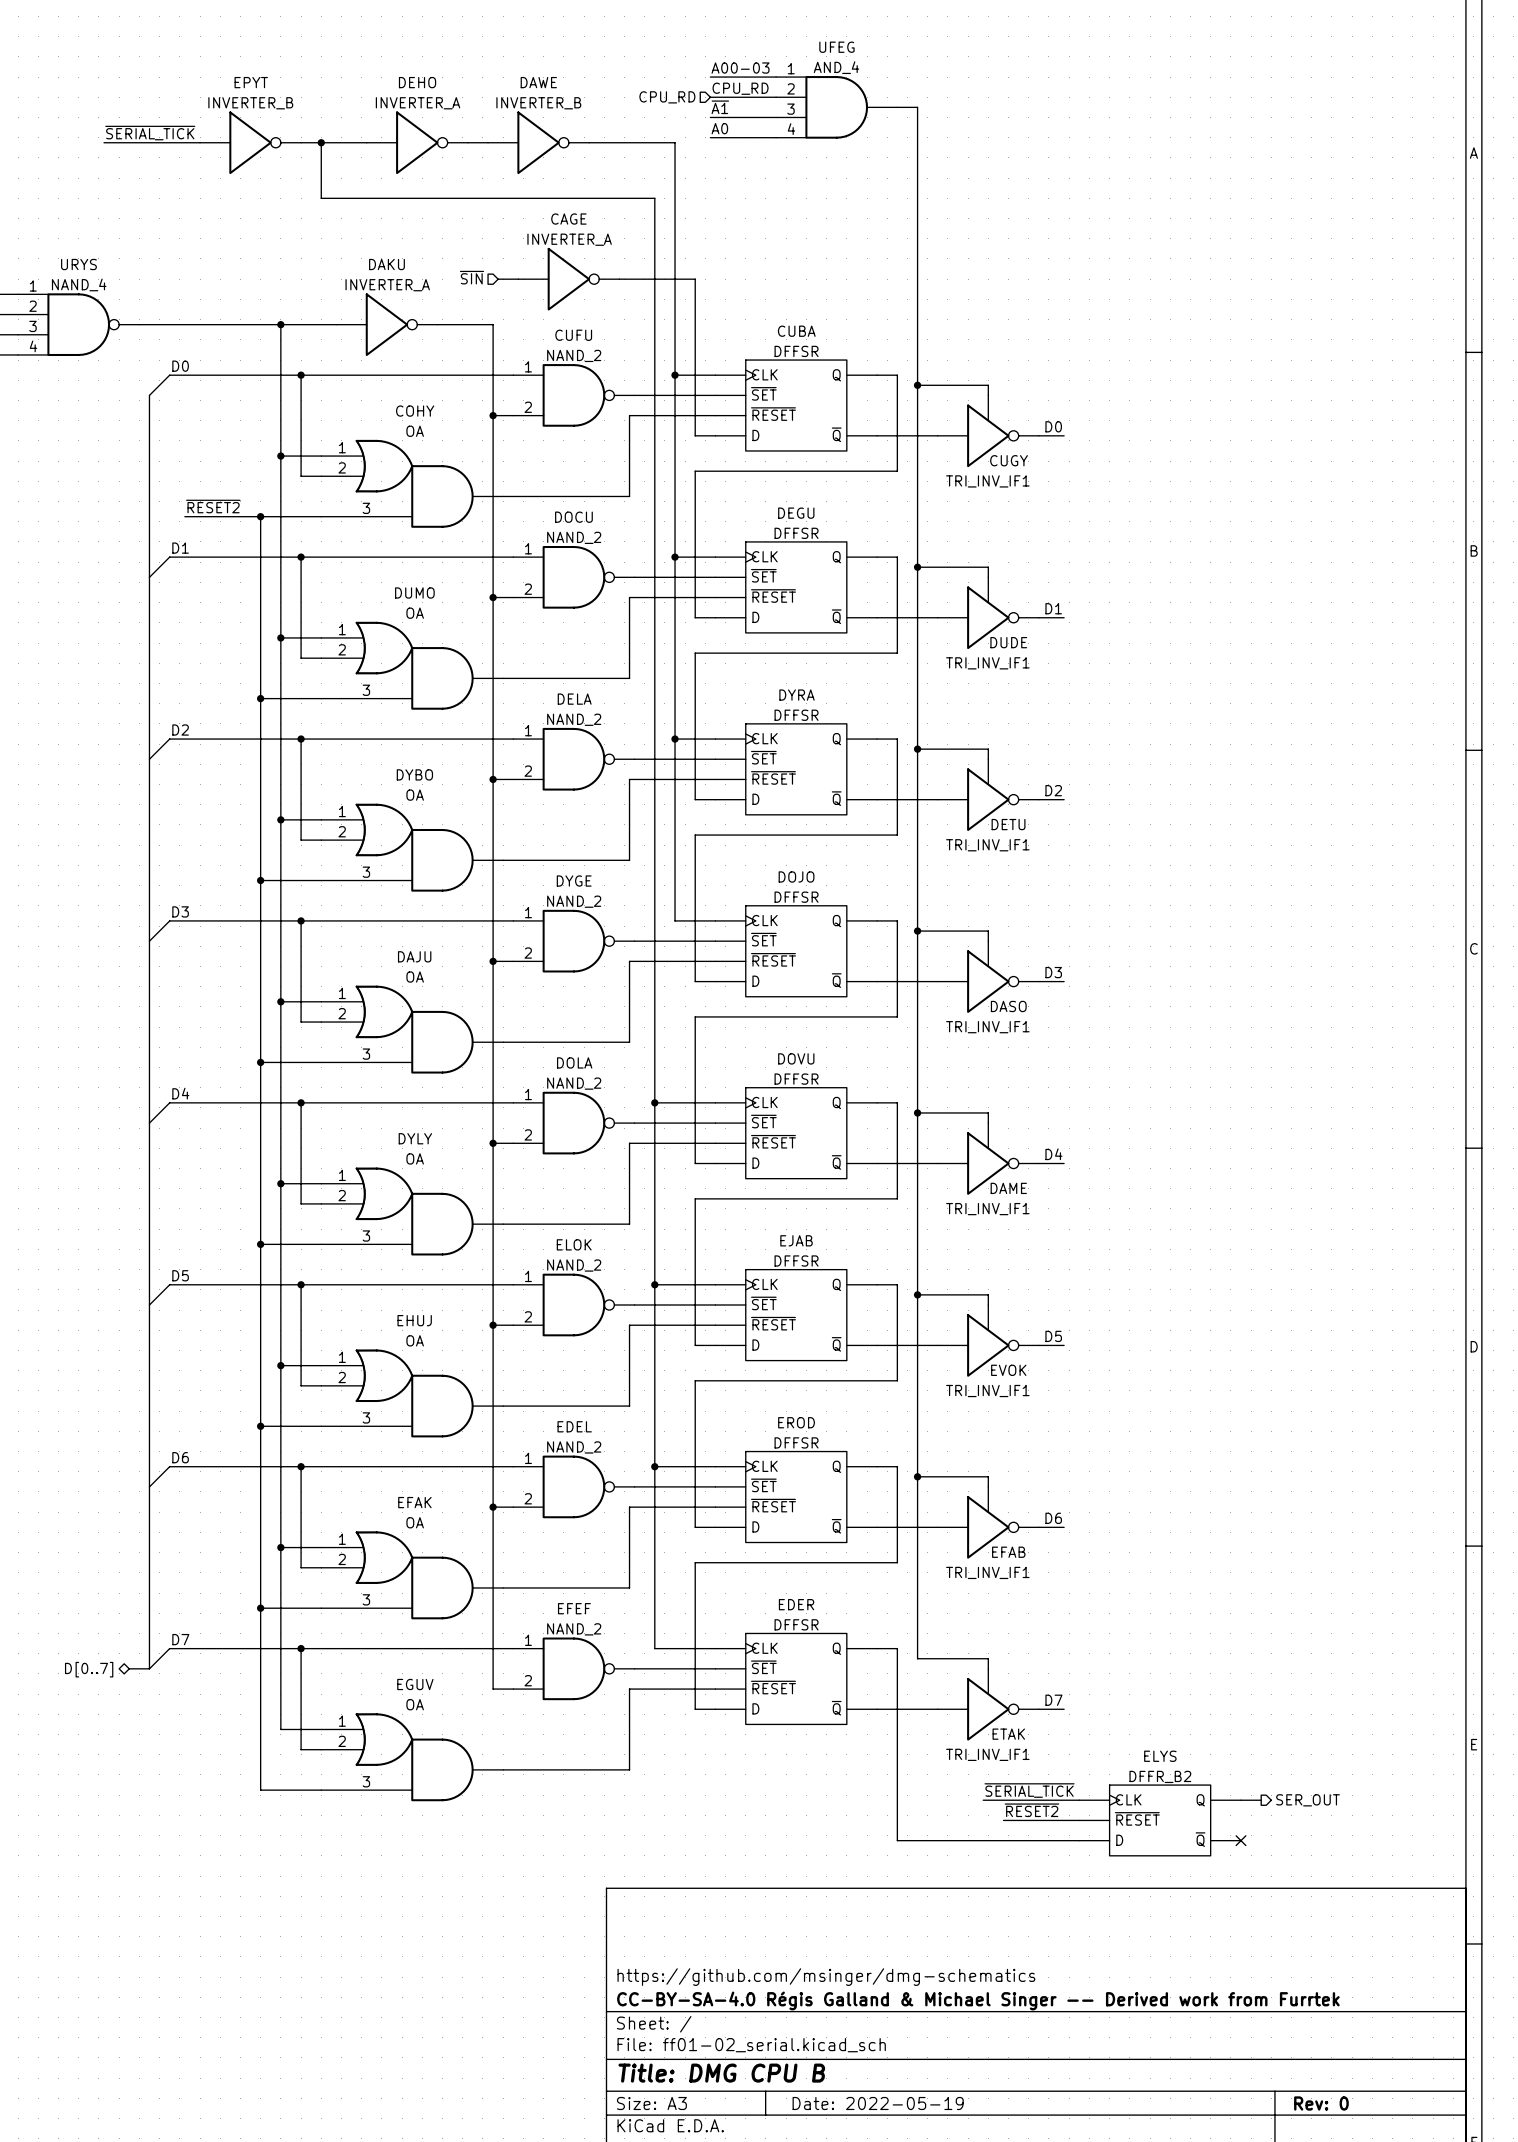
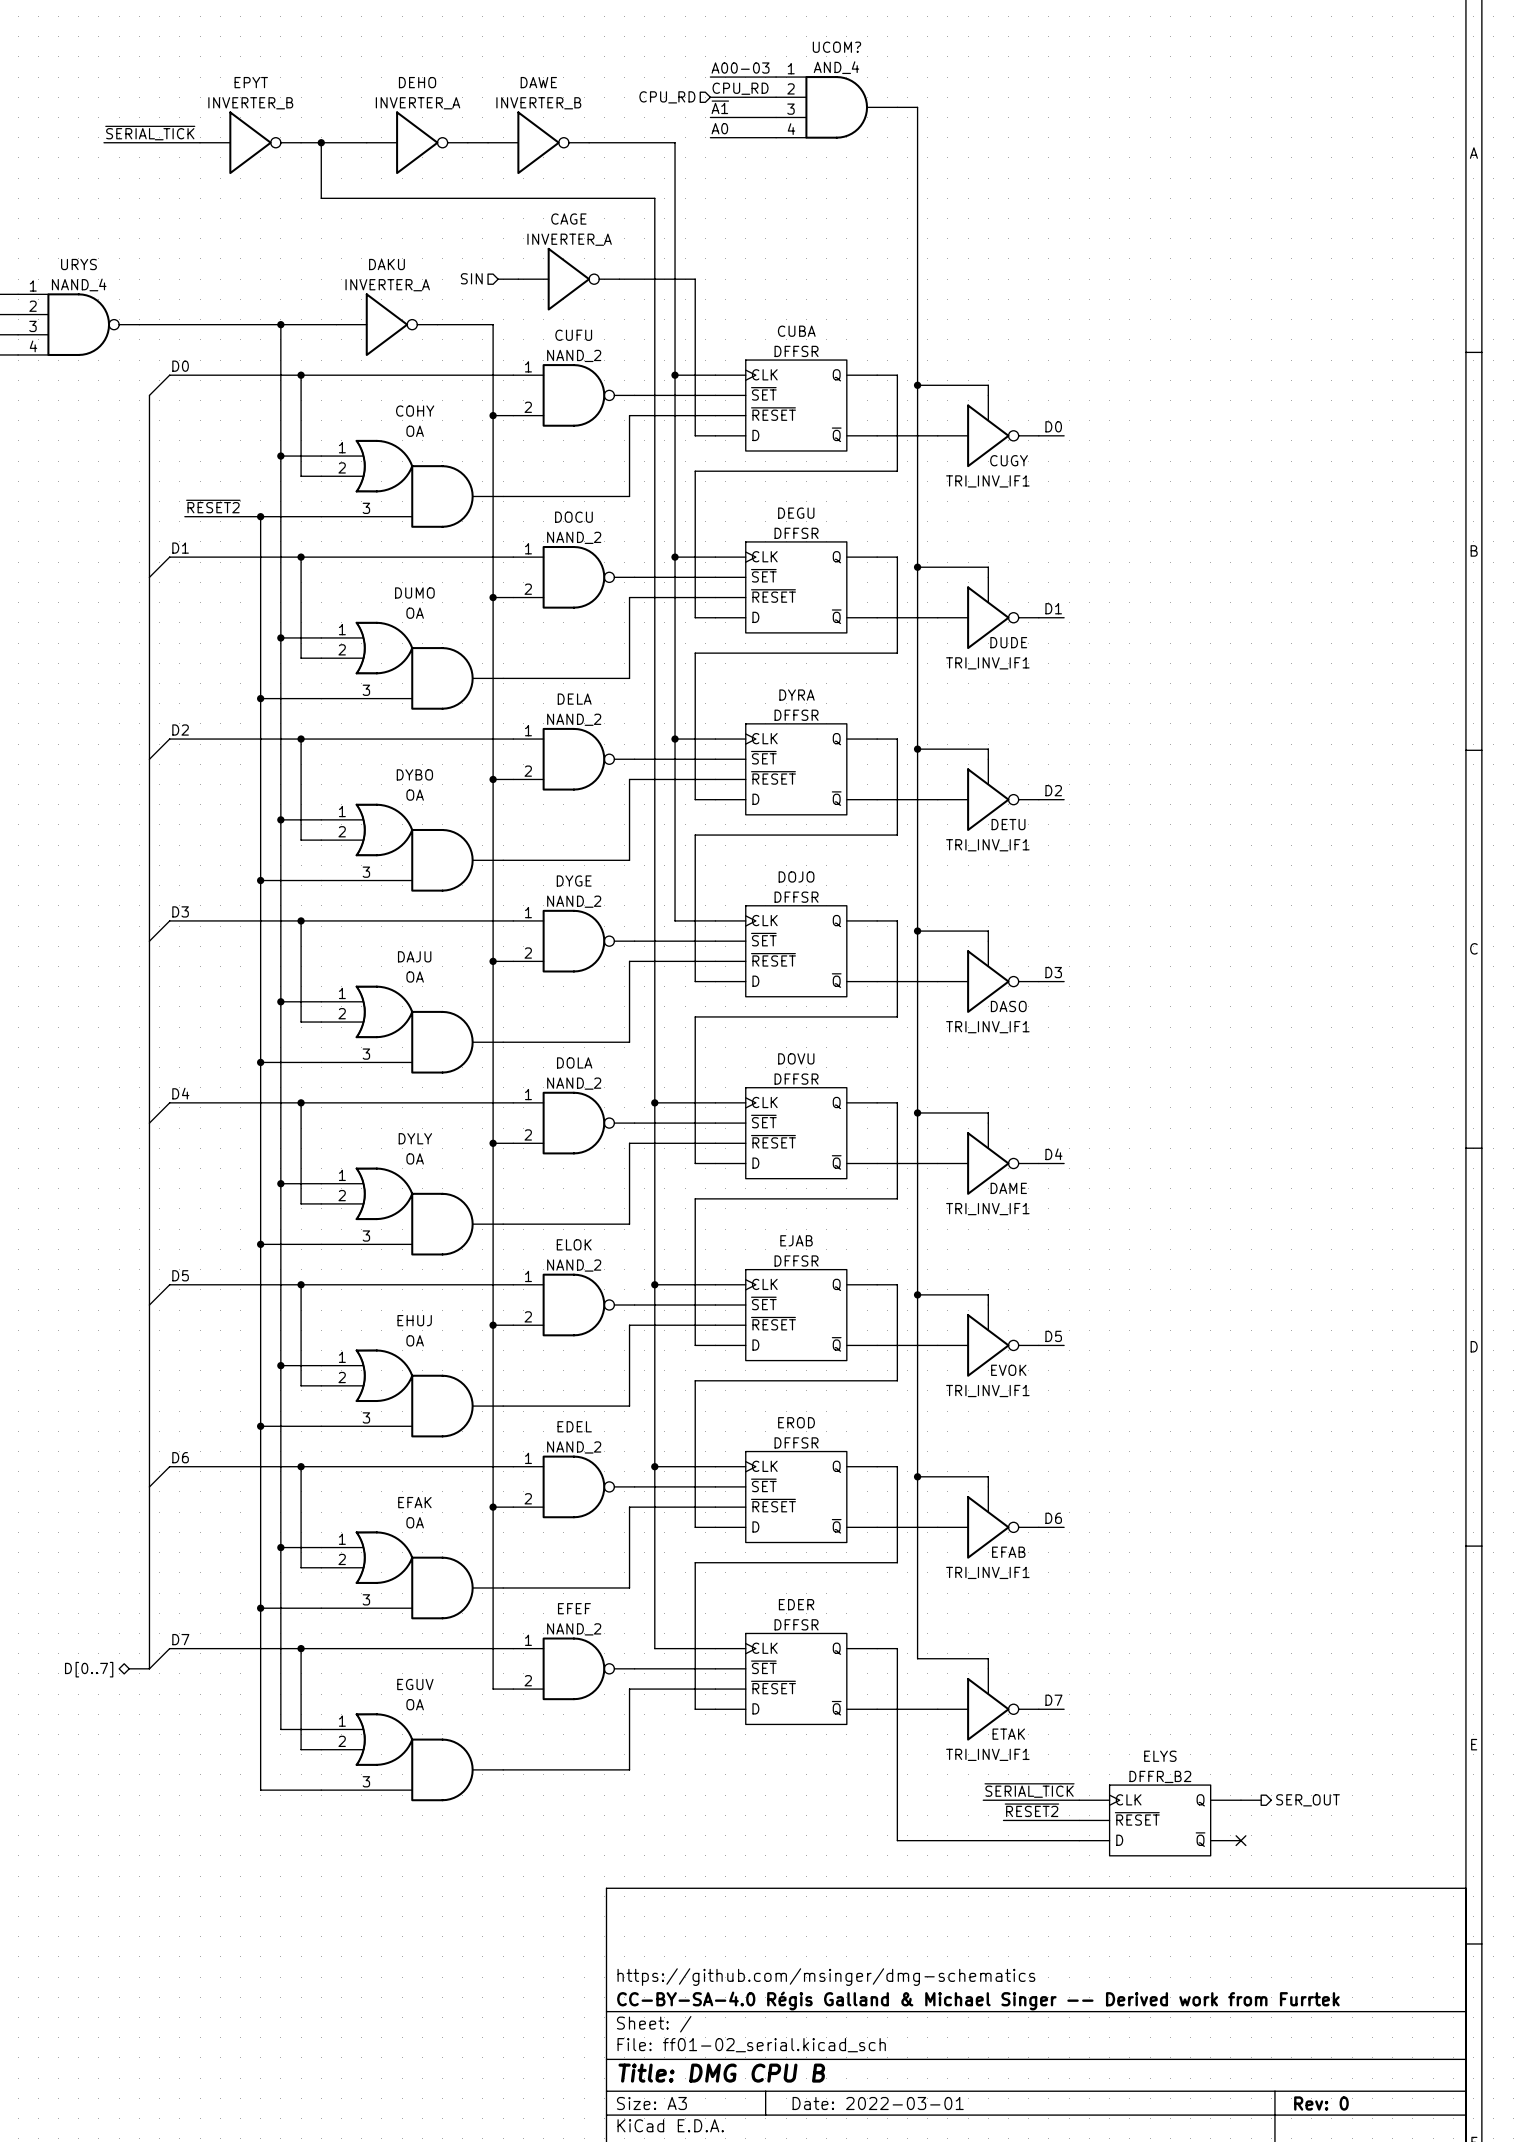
UFEG name: UFEG (836, 47) -> UCOM? (836, 47)
hierarchical label: ~{SIN} (472, 277) -> SIN (471, 278)
title block: Date: 2022-05-19 (878, 2103) -> Date: 2022-03-01 (878, 2103)

